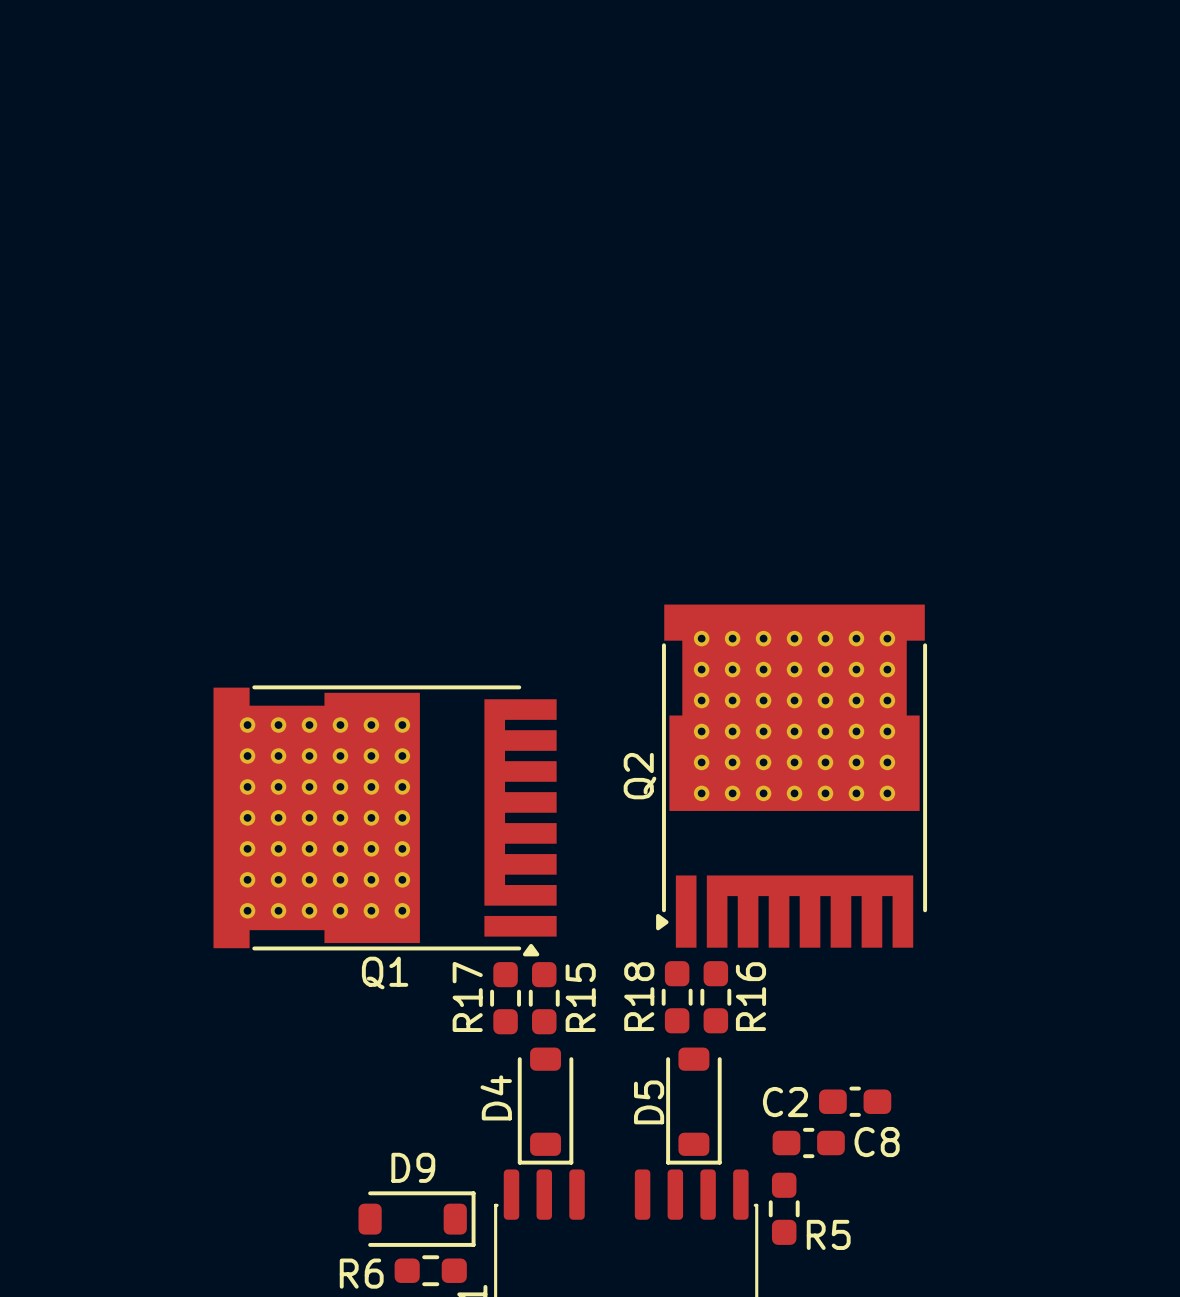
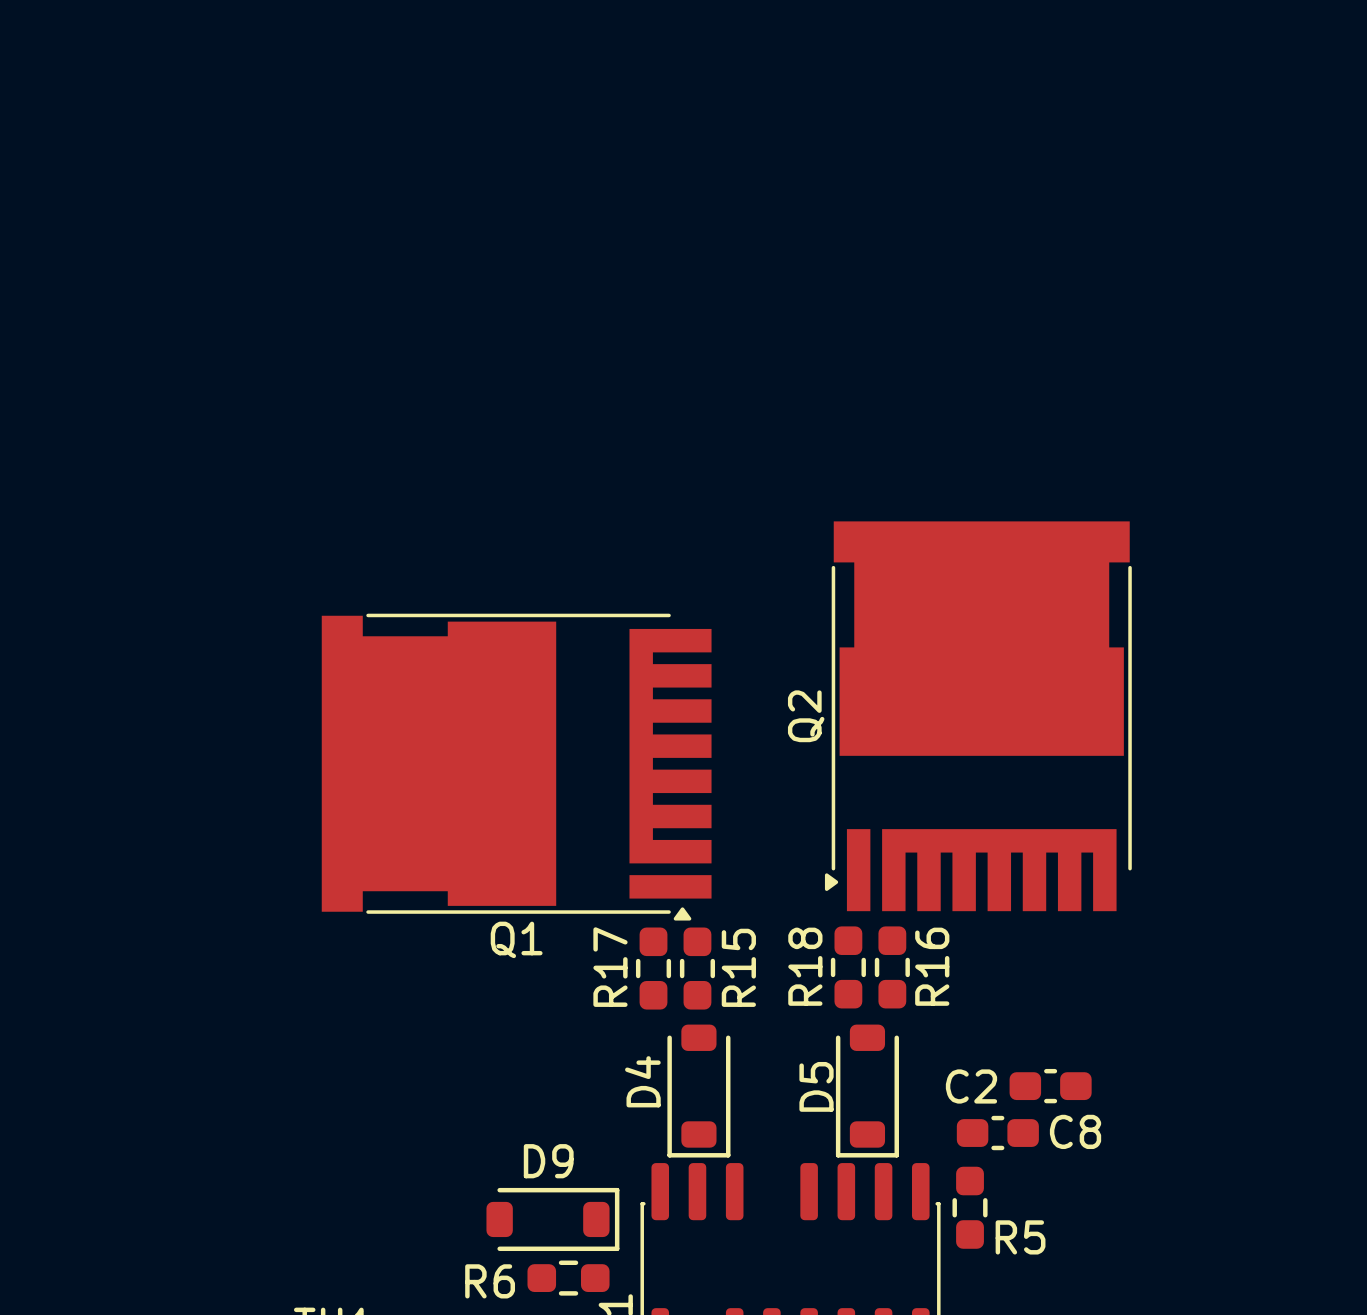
Q2 footprint: [656, 604, 928, 948] -> [824, 521, 1132, 912]
Q1 footprint: [213, 685, 557, 957] -> [321, 613, 712, 921]

